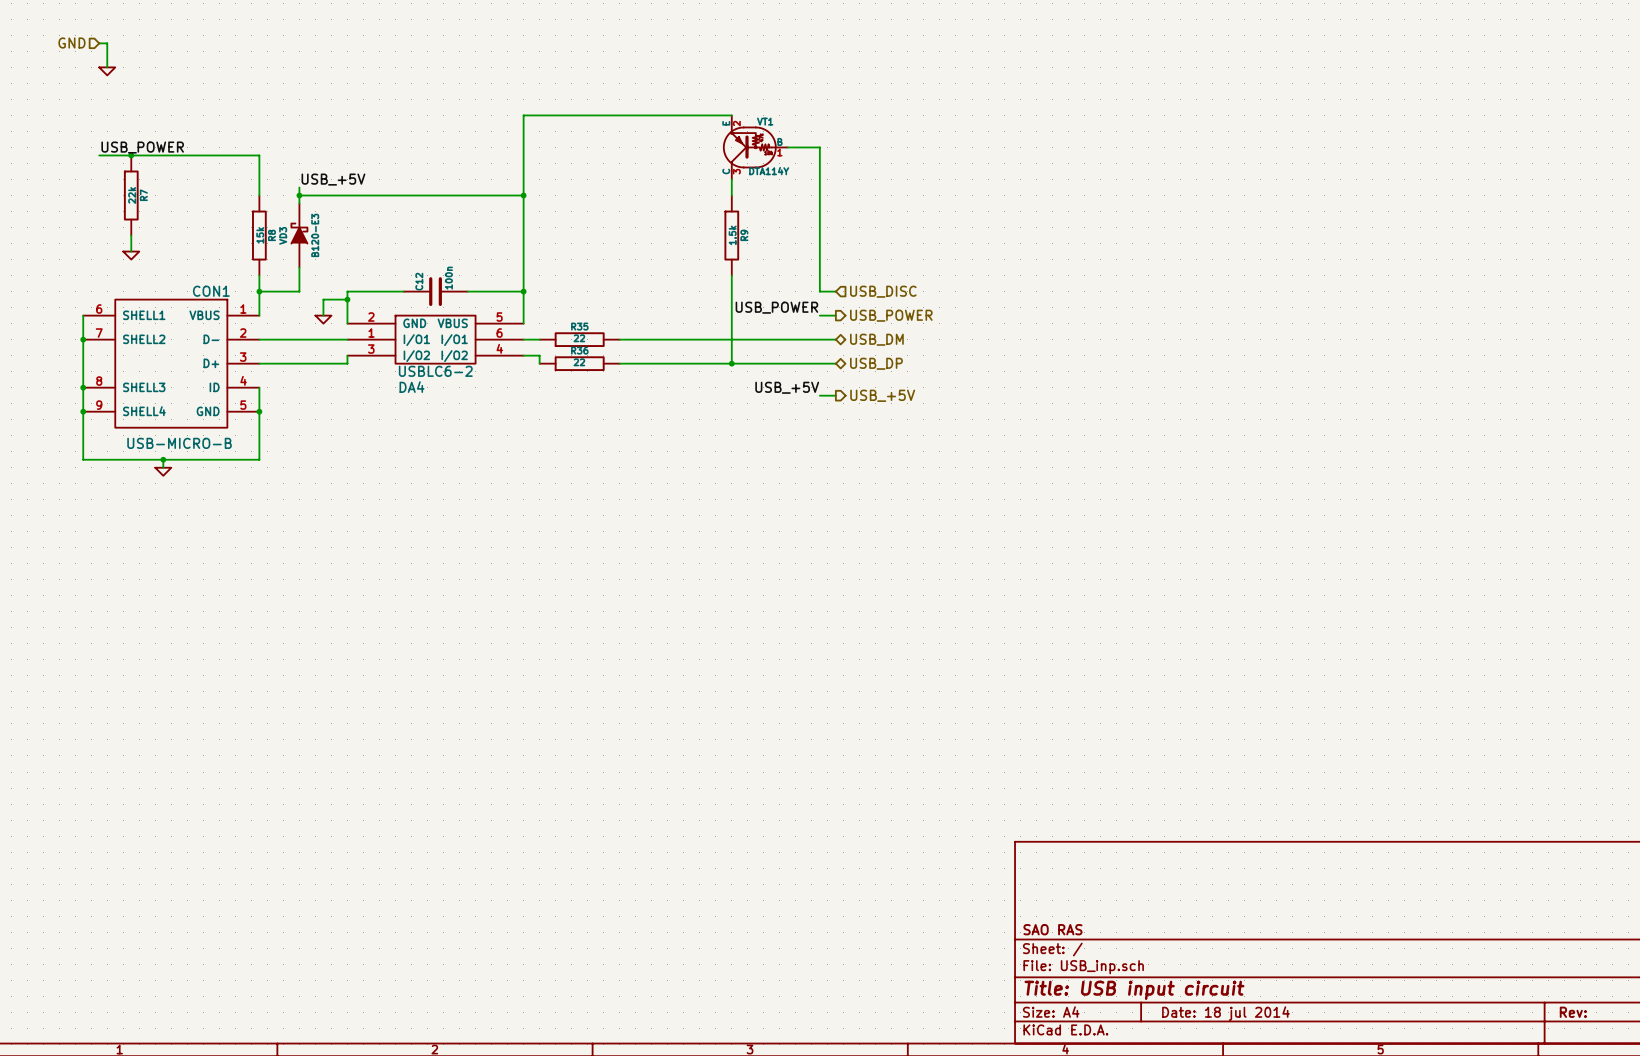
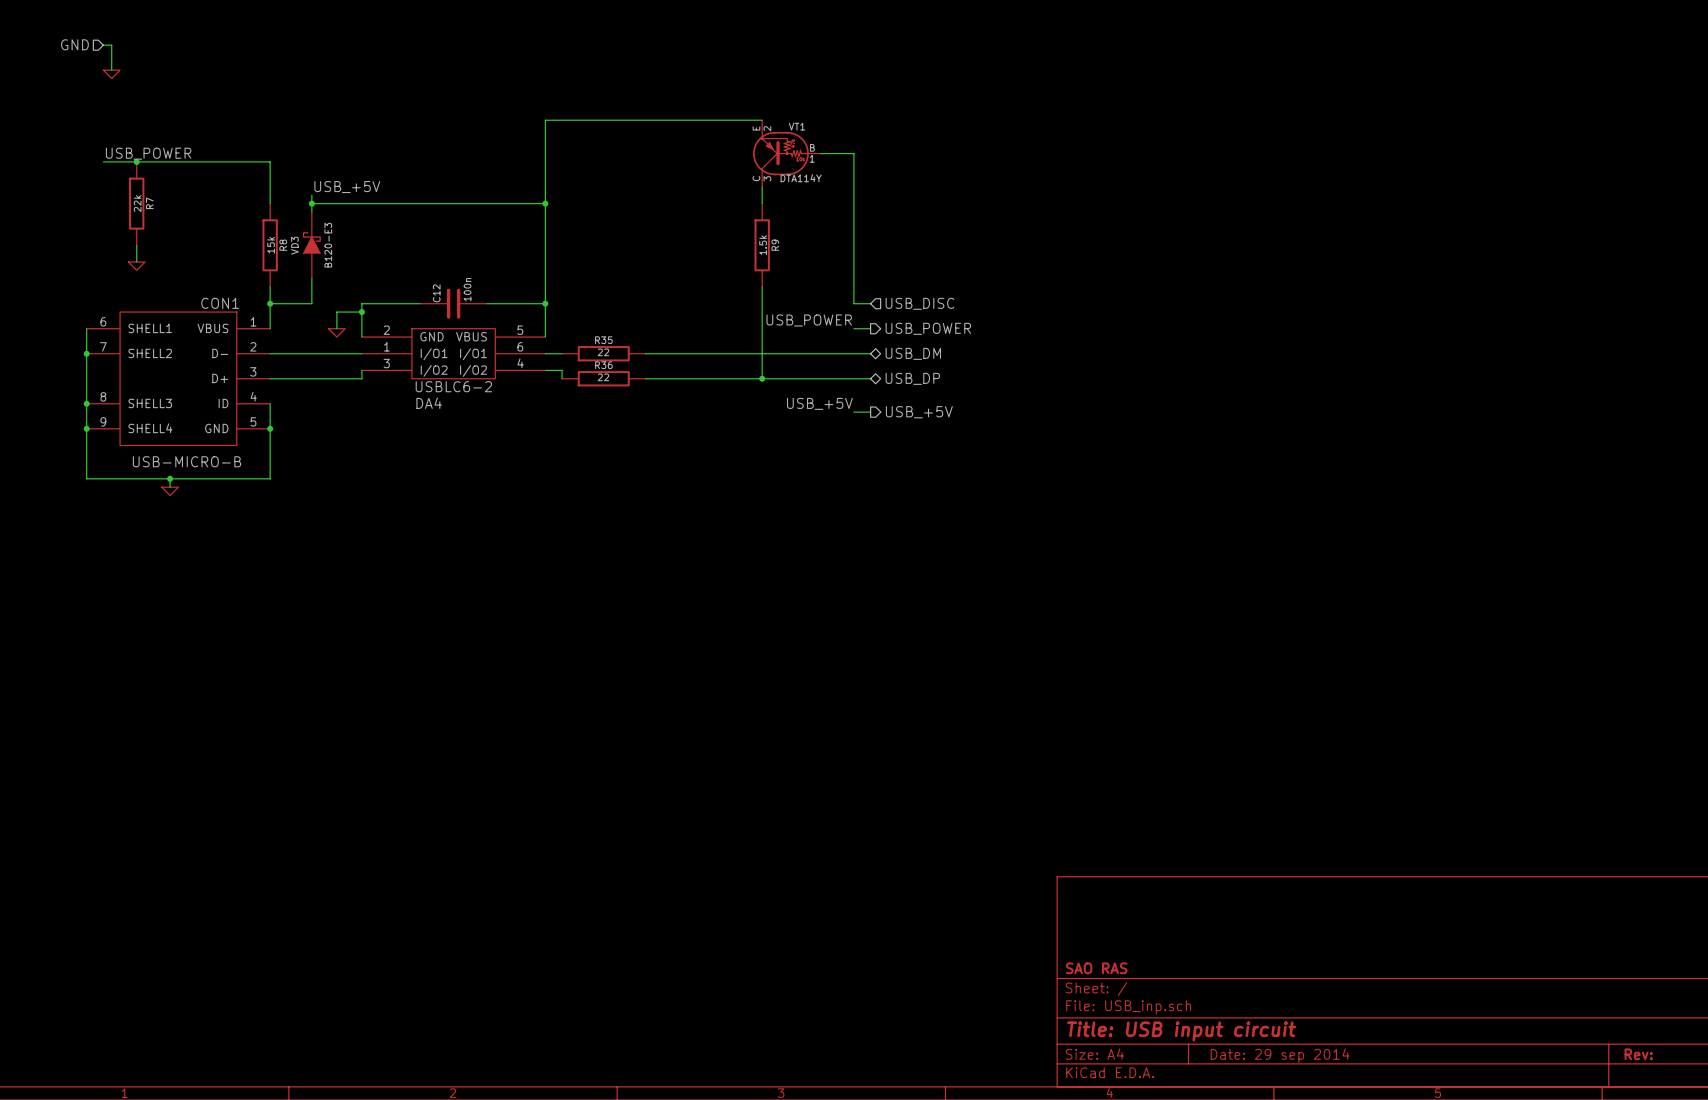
title block: Date: 18 jul 2014 (1225, 1013) -> Date: 29 sep 2014 (1280, 1055)

